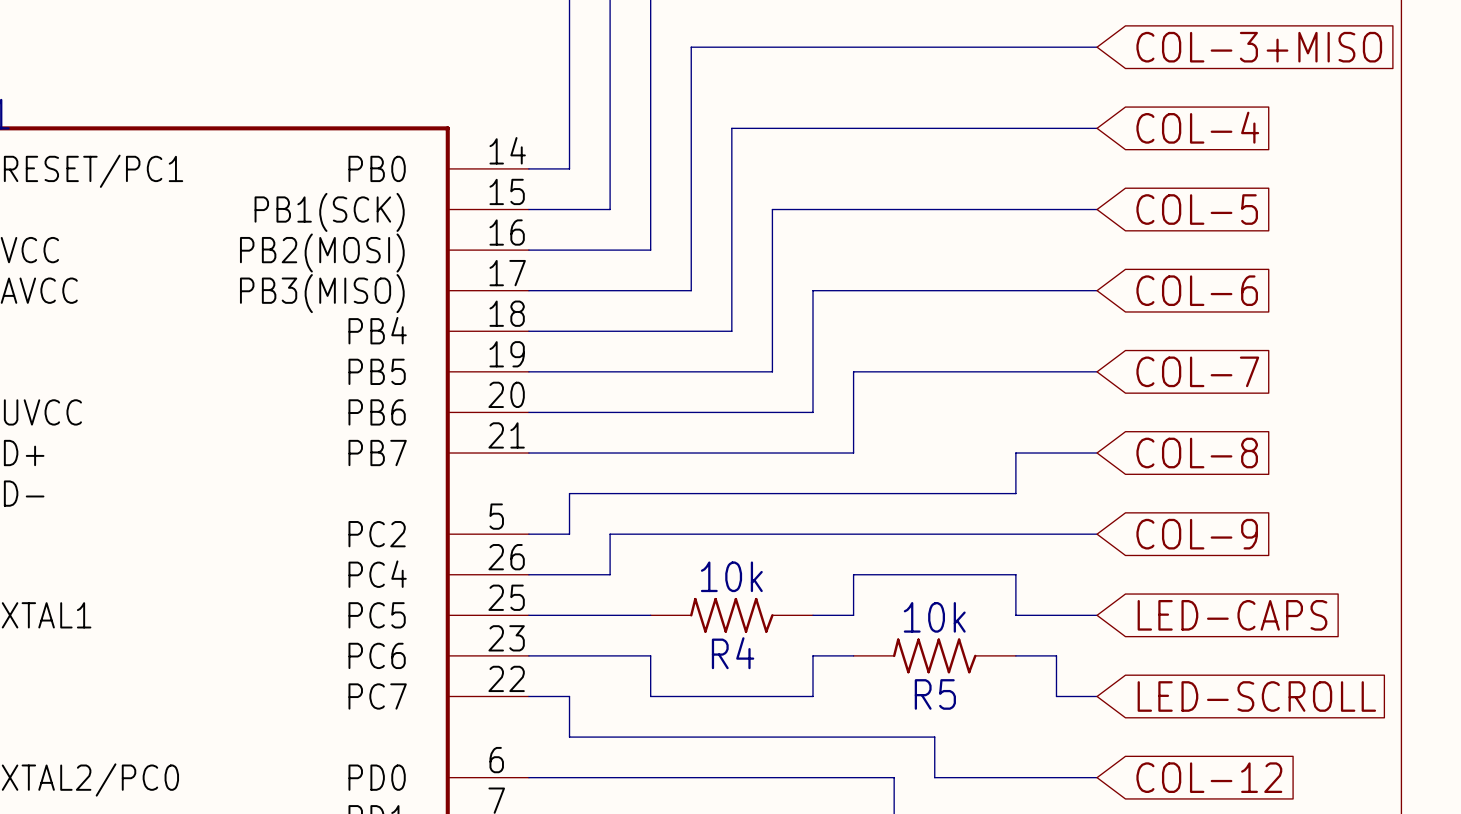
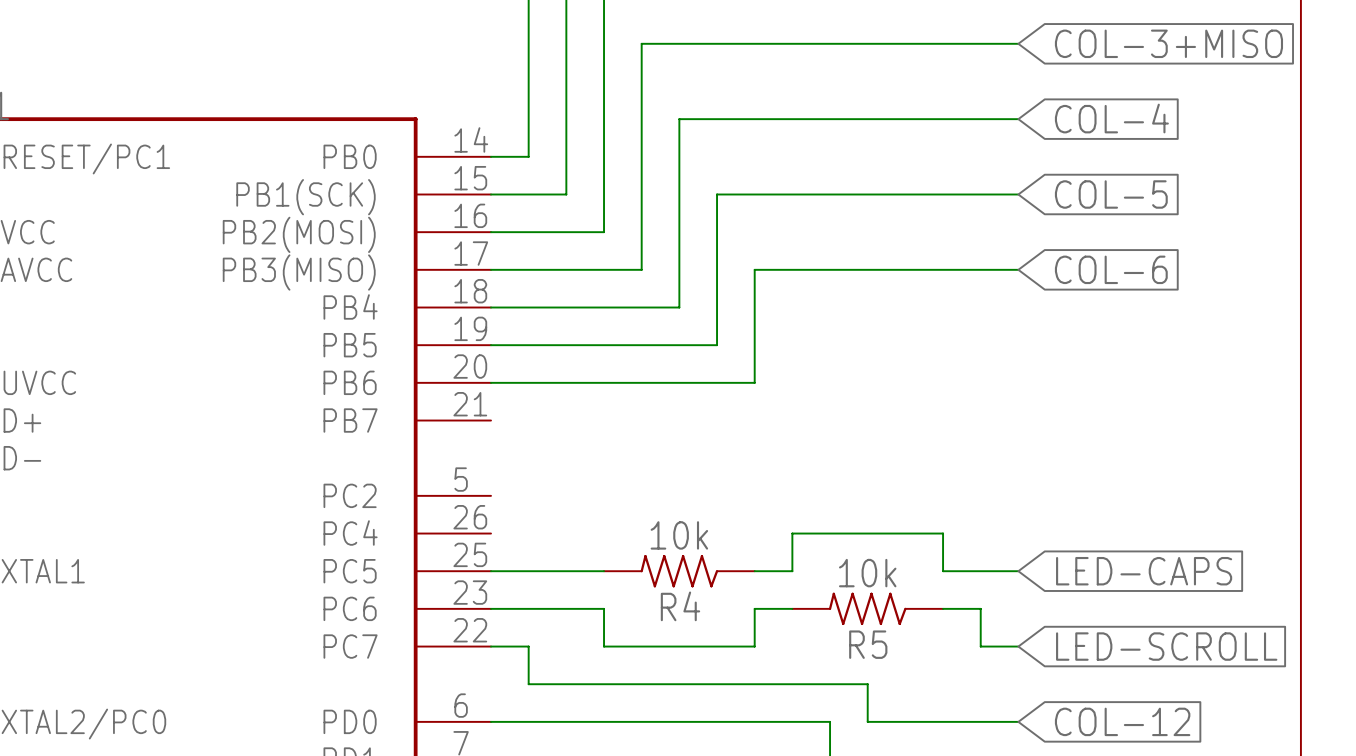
wire: (1097, 371) (853, 371) (853, 453) (528, 453) -> none
global label: COL-7 (1197, 371) -> none
wire: (1097, 453) (1015, 453) (1015, 493) (569, 493) (569, 534) (528, 534) -> none
global label: COL-8 (1197, 453) -> none
wire: (1097, 534) (610, 534) (610, 574) (528, 574) -> none
global label: COL-9 (1197, 534) -> none

